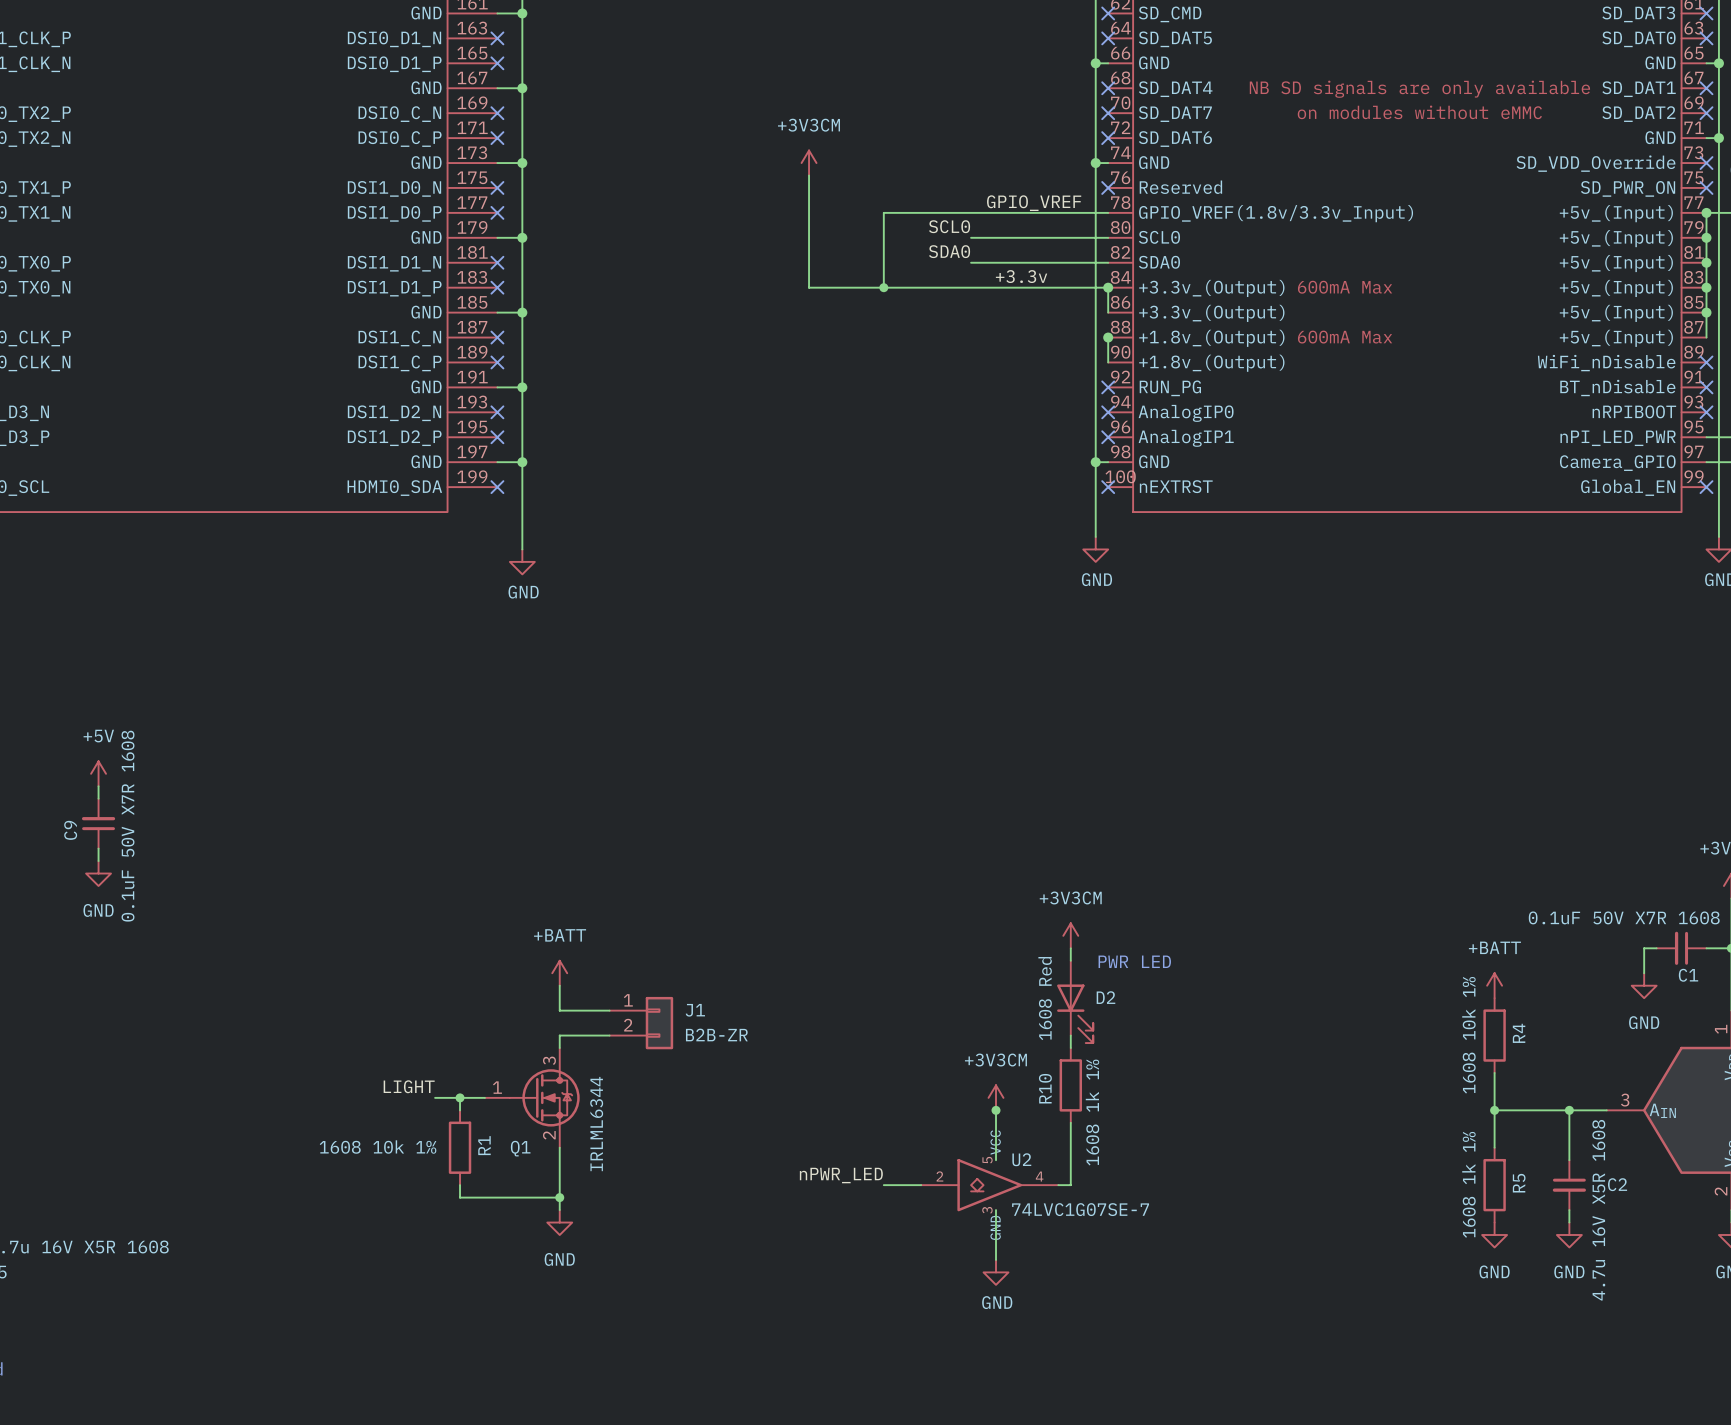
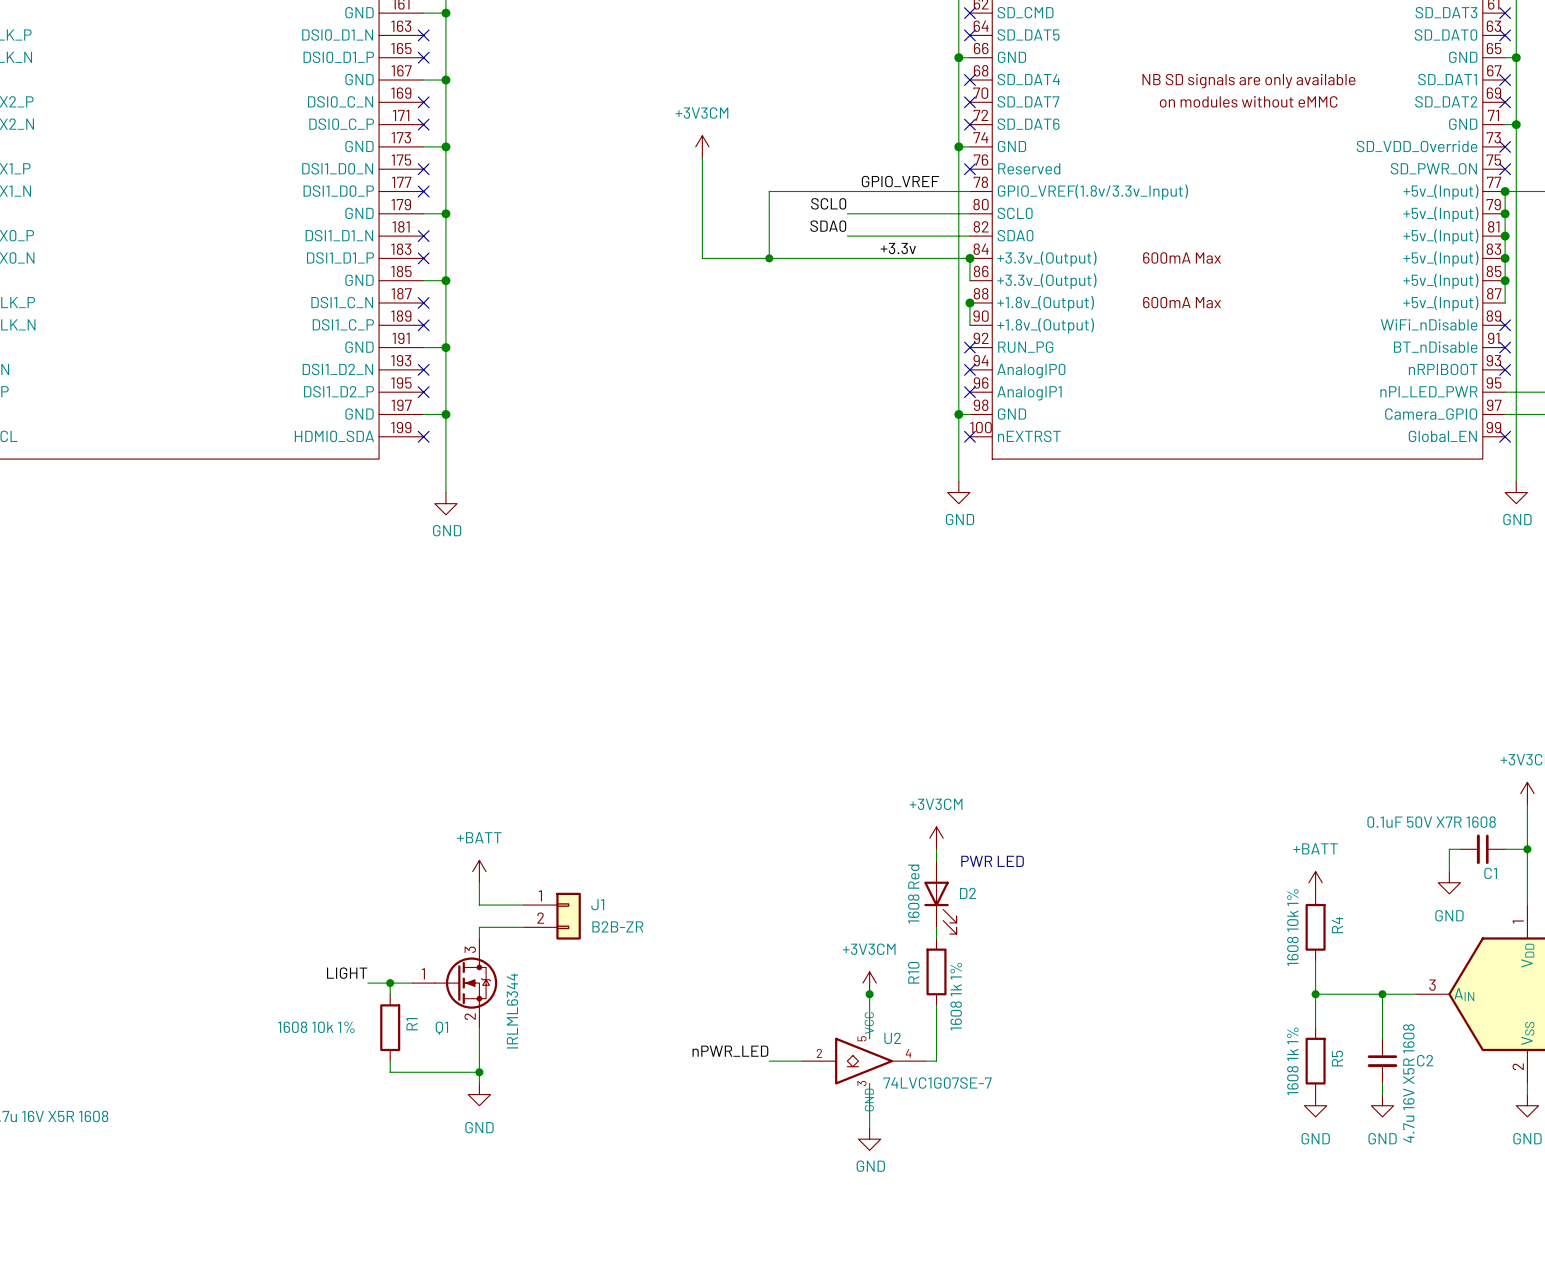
power symbol: +5V (98, 773) -> none
wire: (98, 786) (98, 798) -> none
C9: (98, 823) -> none
wire: (98, 848) (98, 861) -> none
power symbol: GND (98, 873) -> none

